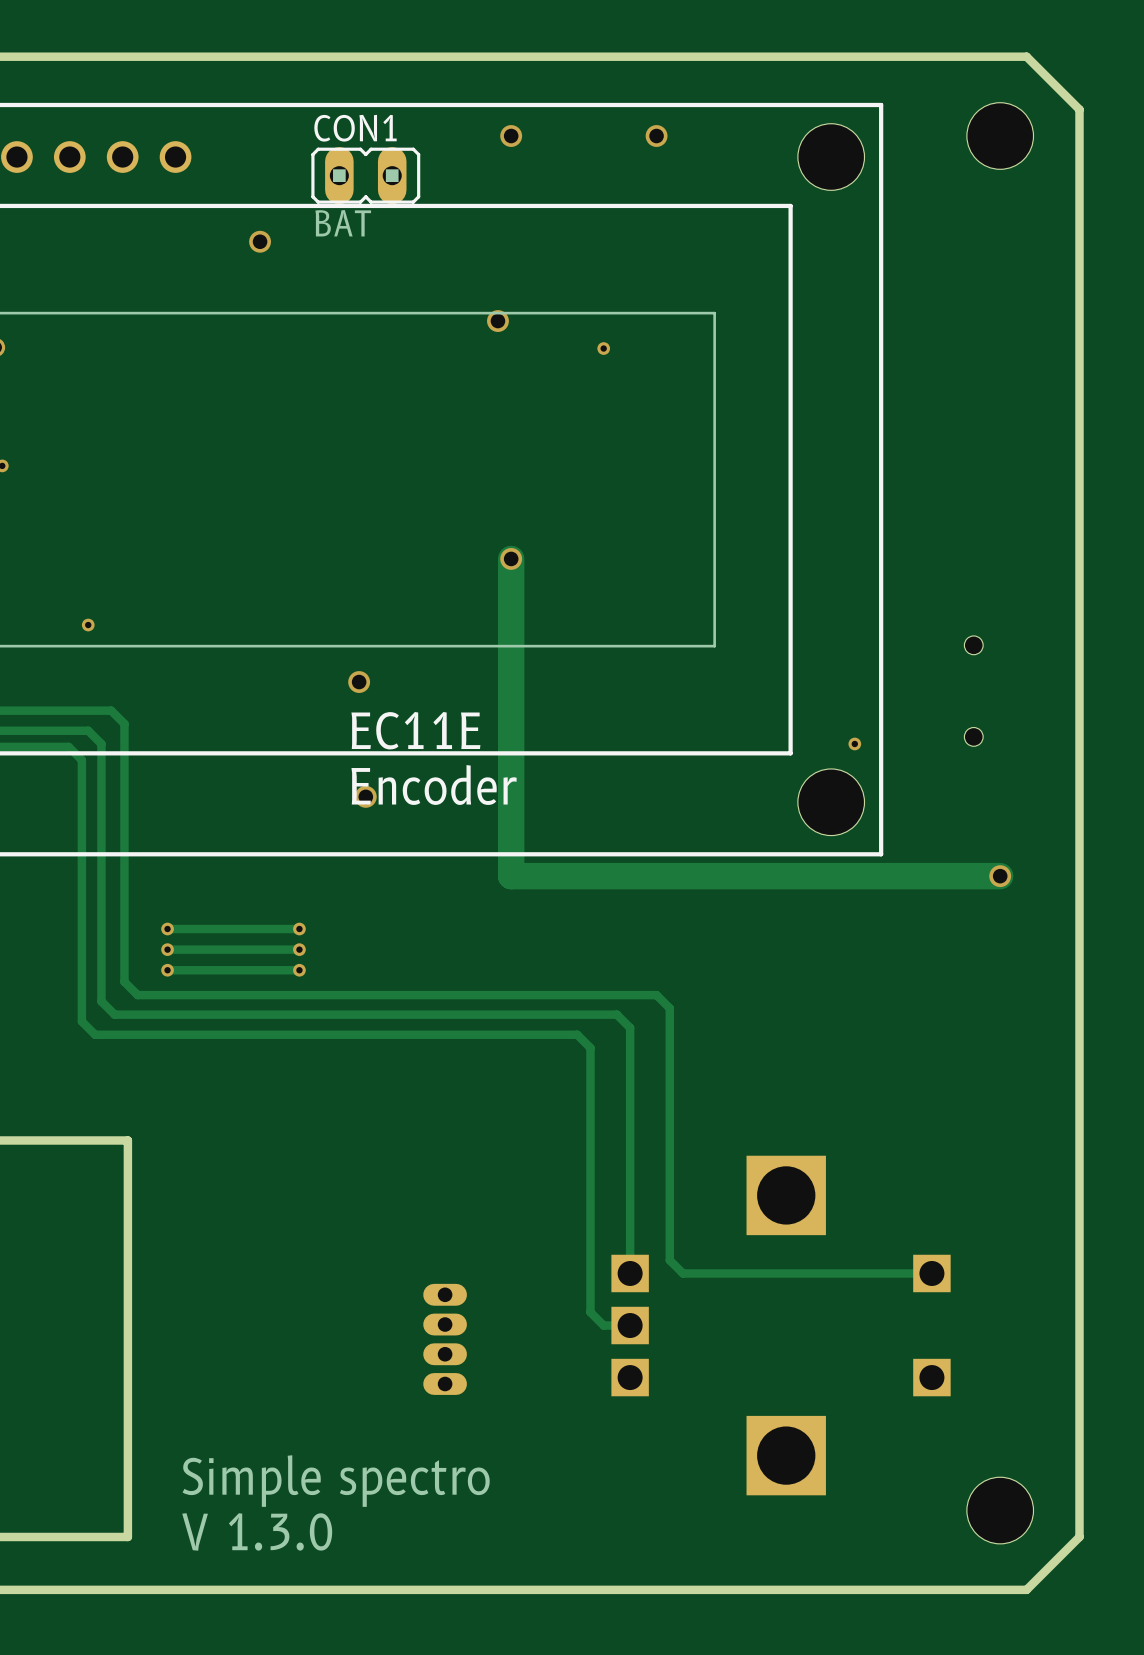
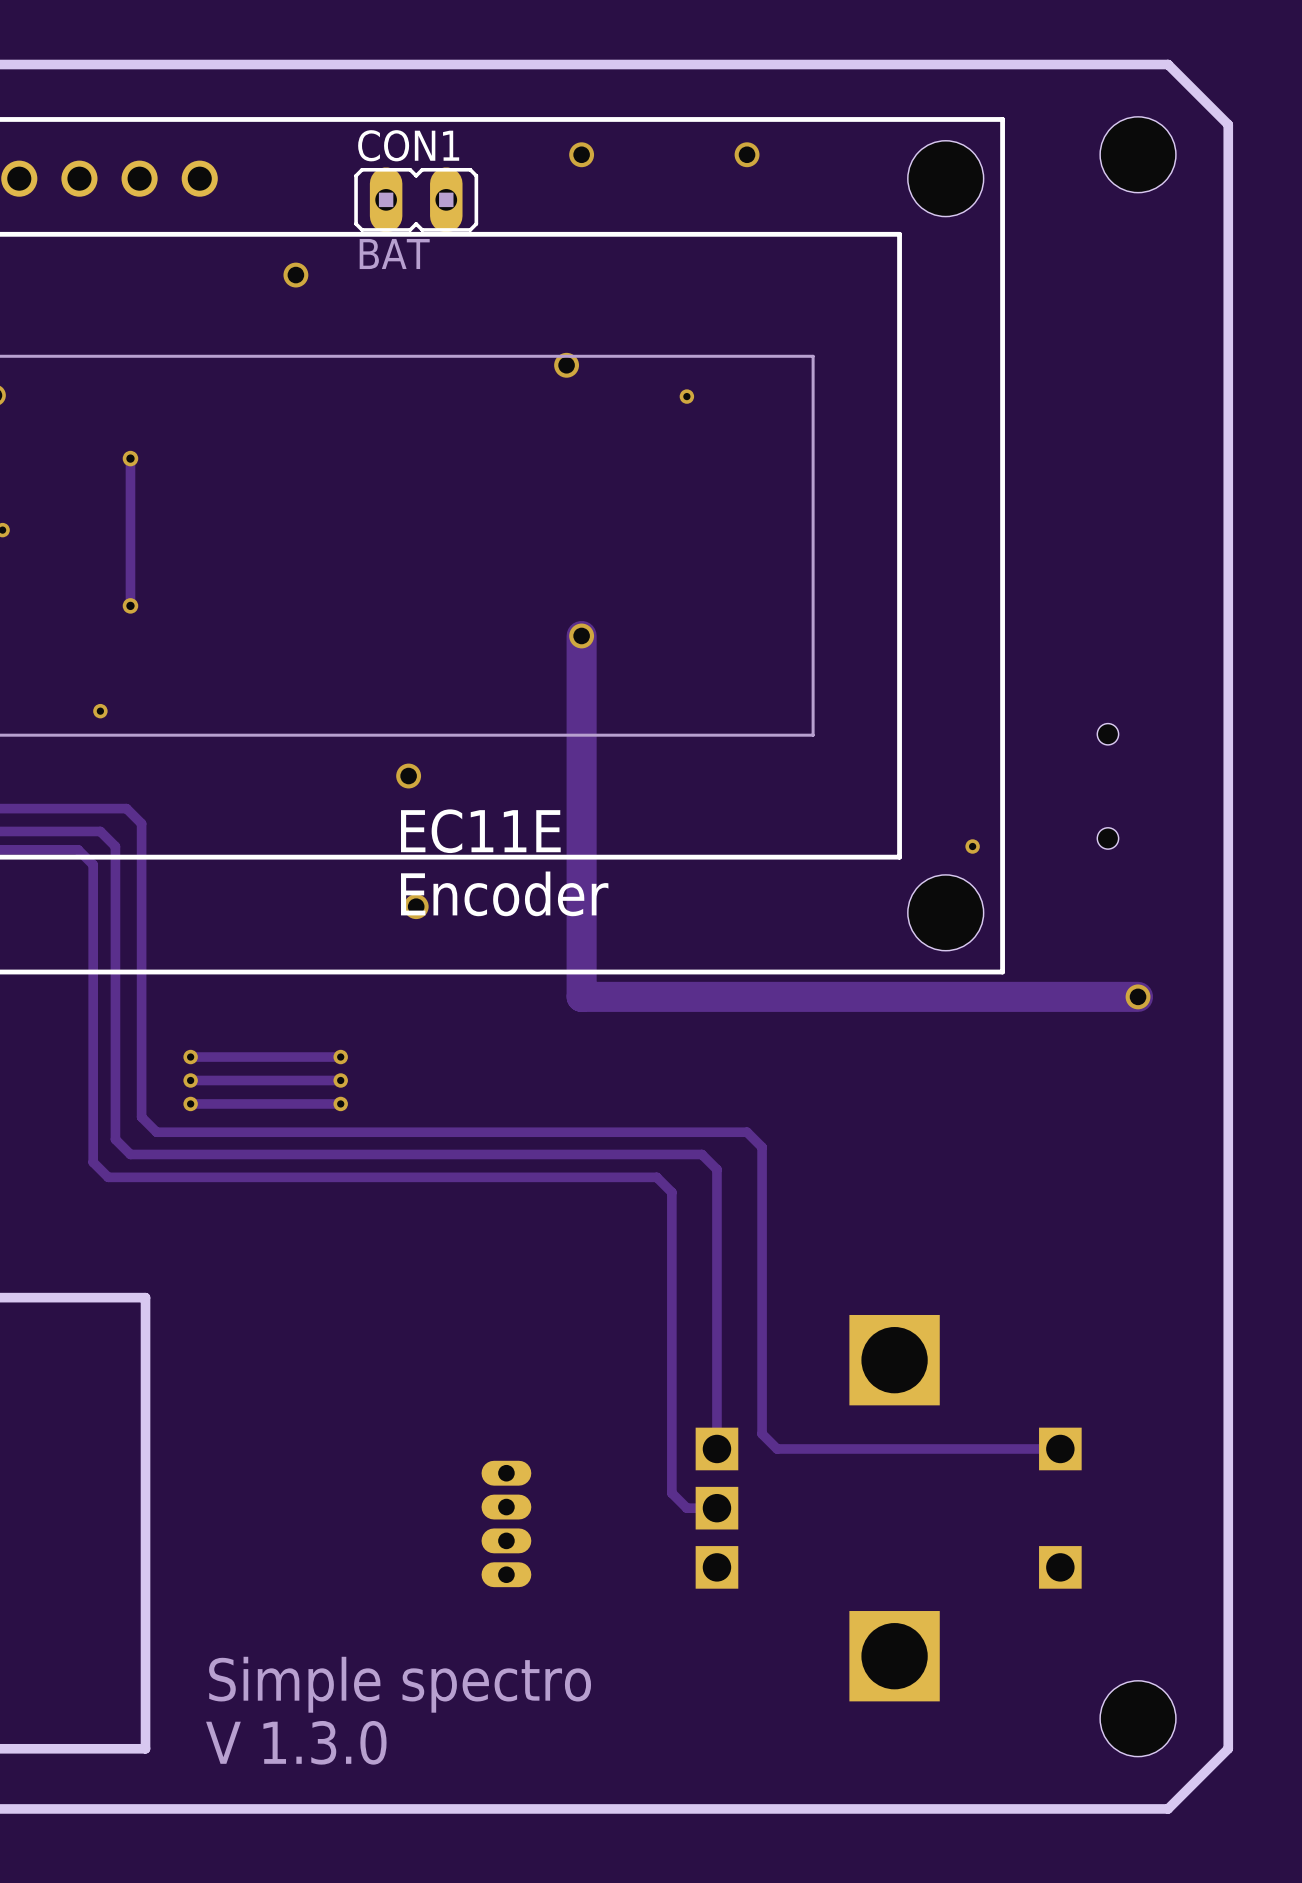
track: none -> (130, 458) (130, 605)
via: none -> (130, 458)
via: none -> (130, 605)

